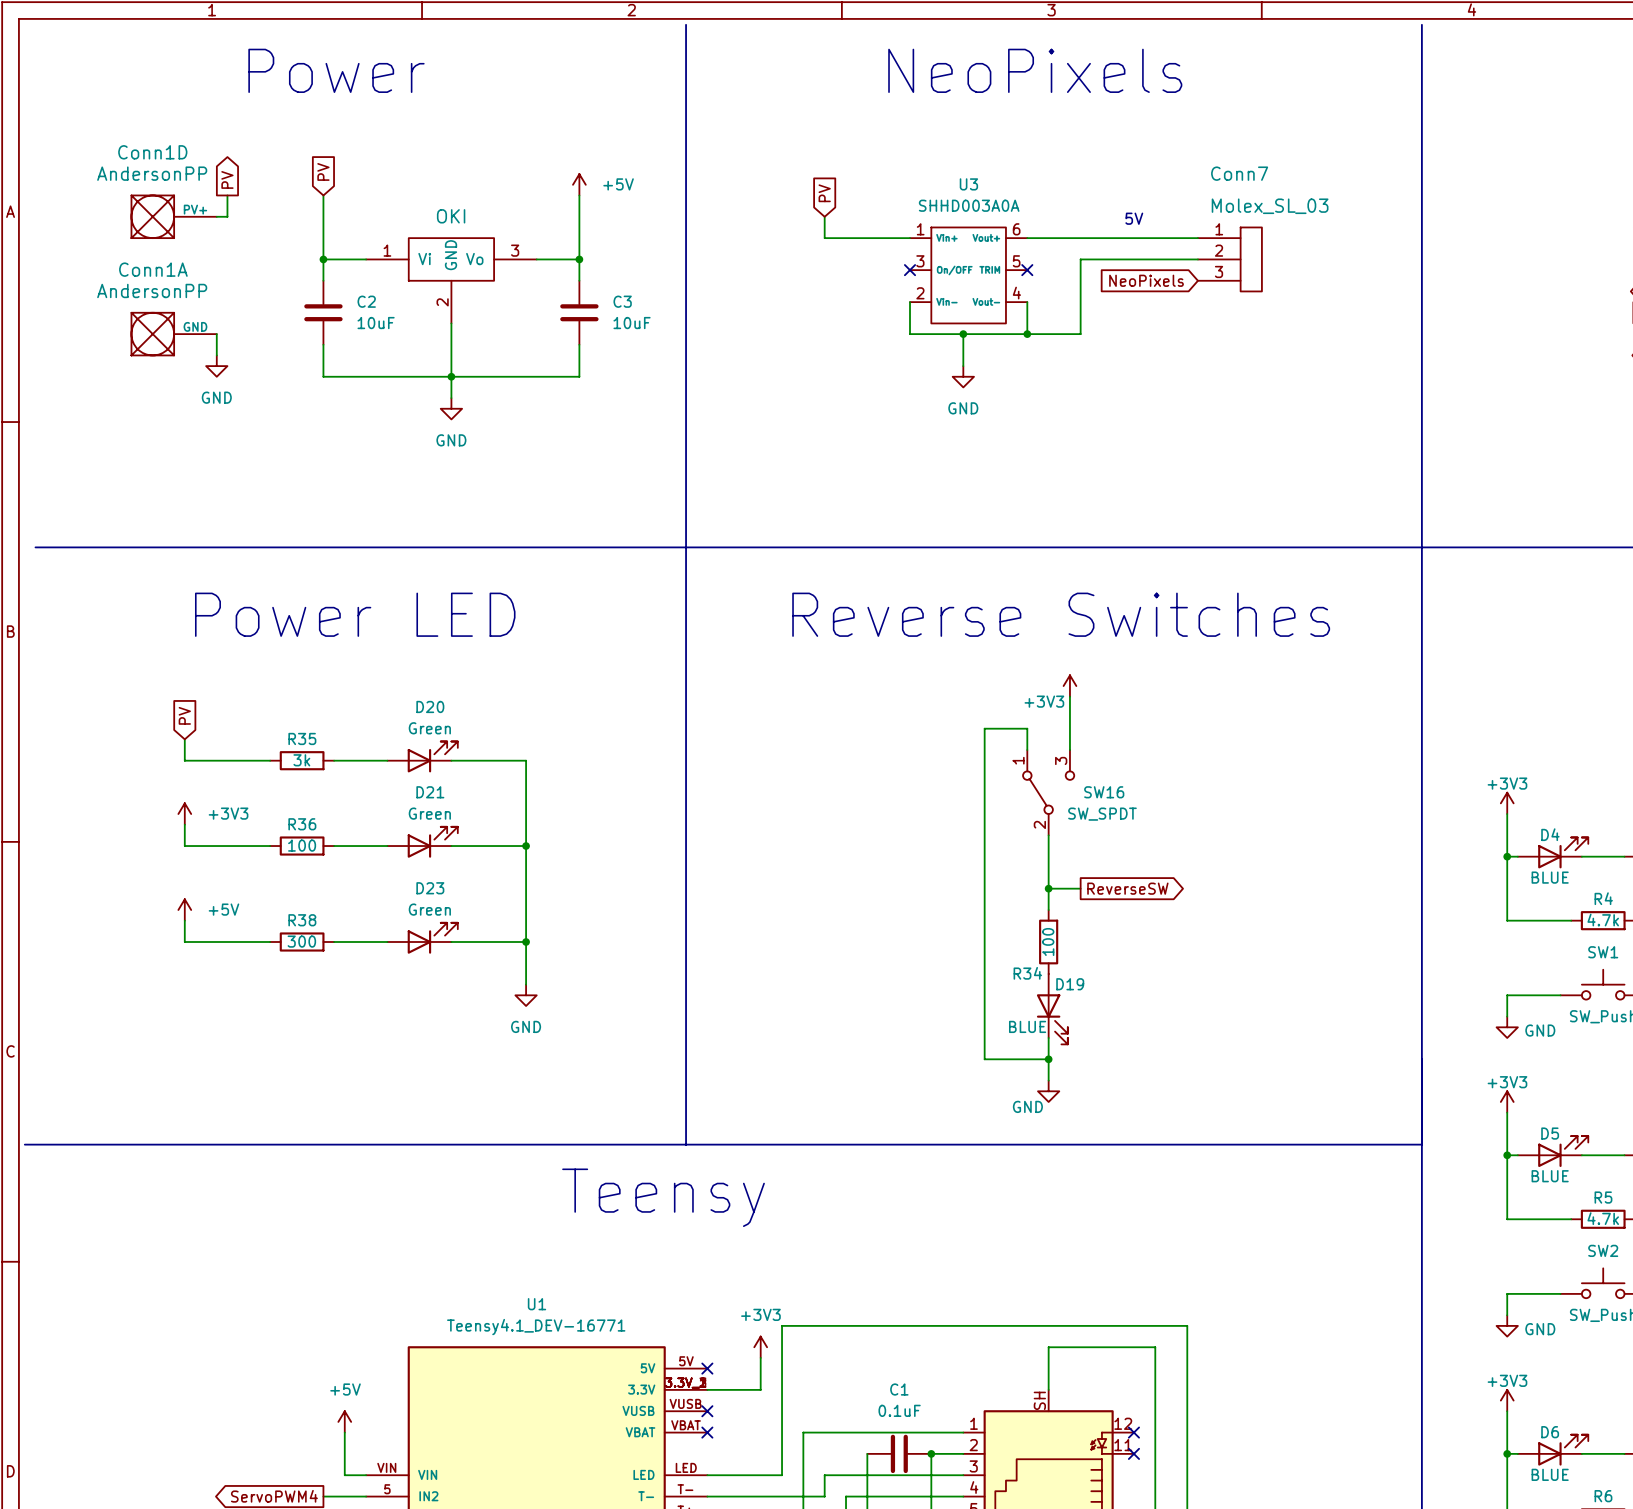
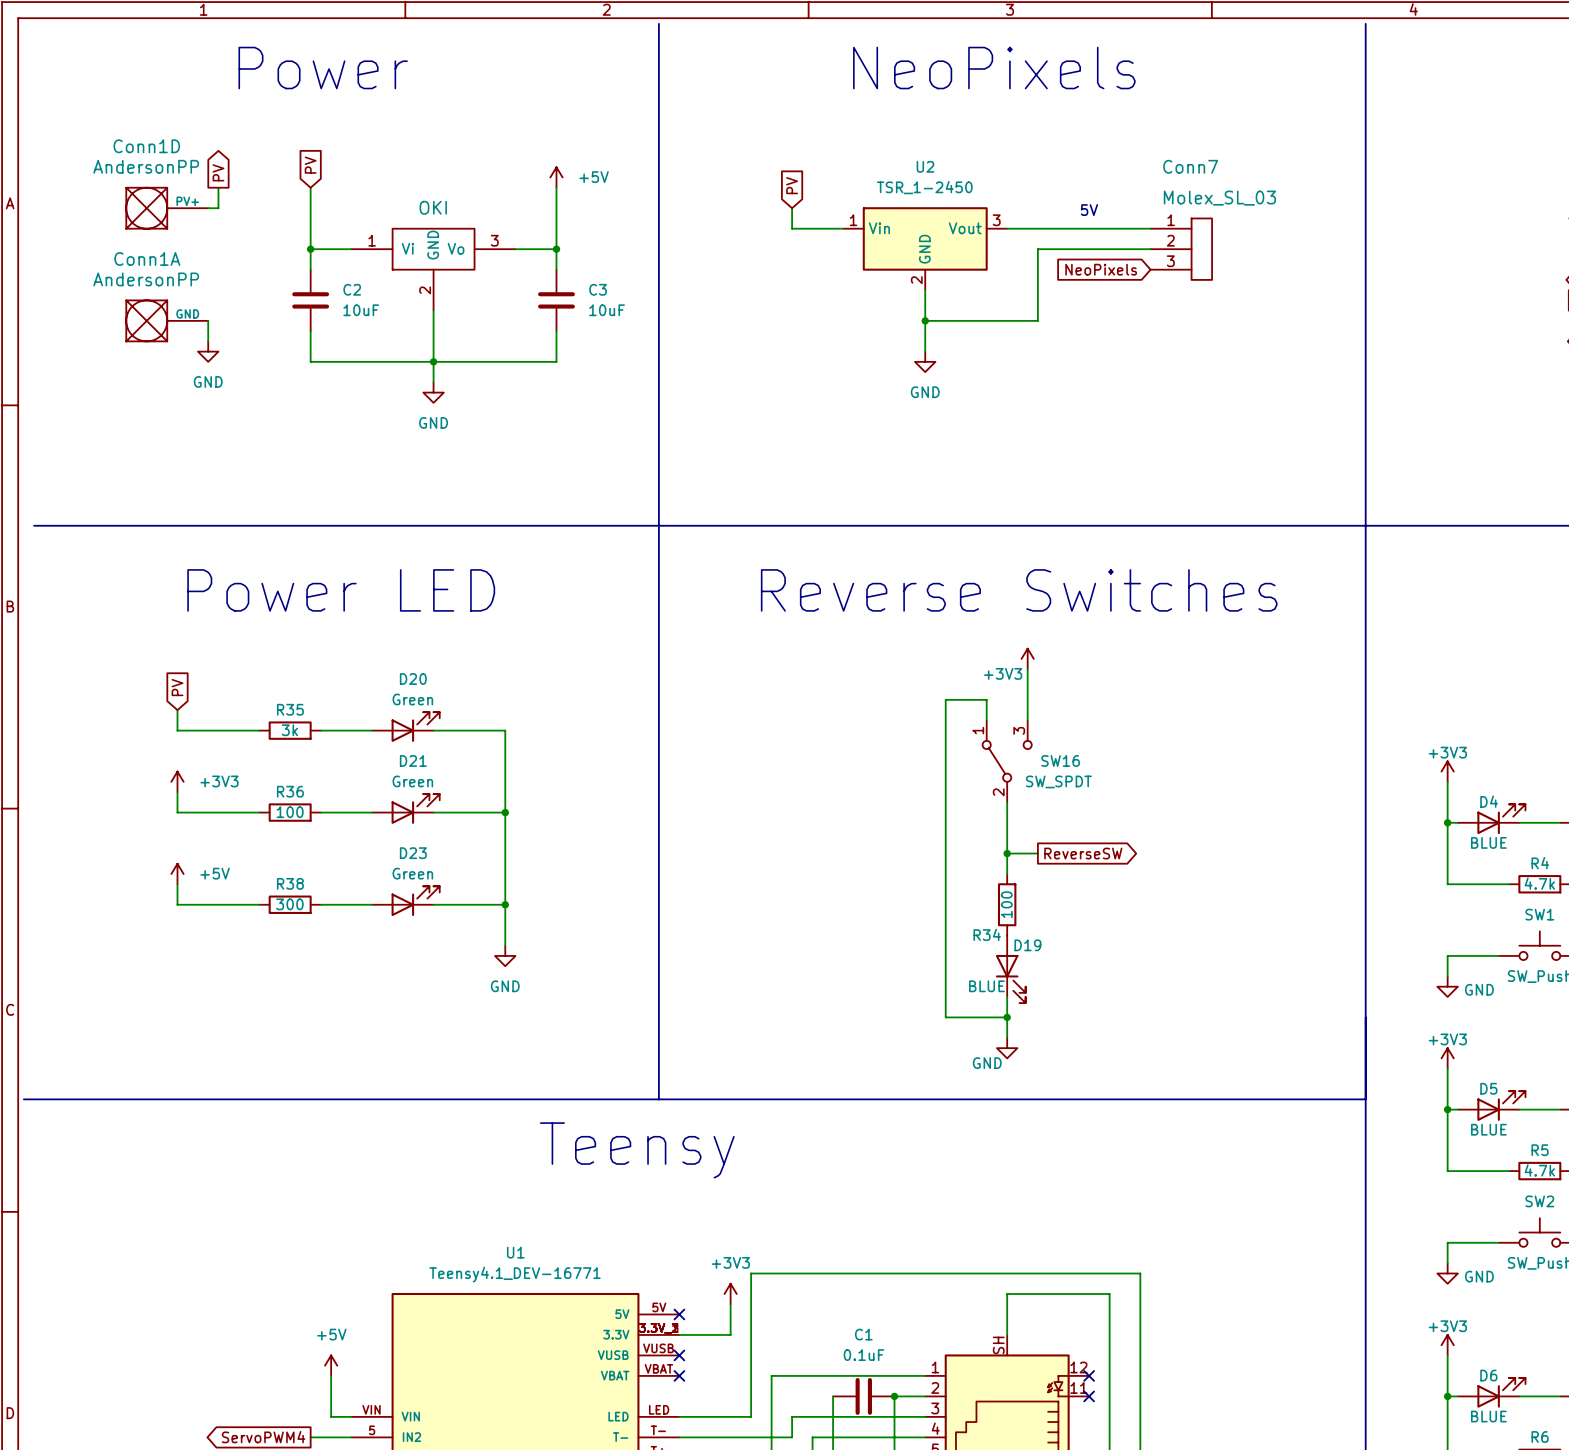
U2: none -> TSR_1-2450 (925, 248)
no-connect mark: (910, 270) -> none
no-connect mark: (1027, 270) -> none
U3: SHHD003A0A (968, 275) -> none
wire: (910, 302) (910, 334) (963, 334) -> (925, 290) (925, 320)
wire: (1027, 302) (1027, 334) -> none
junction: (1027, 334) -> none

